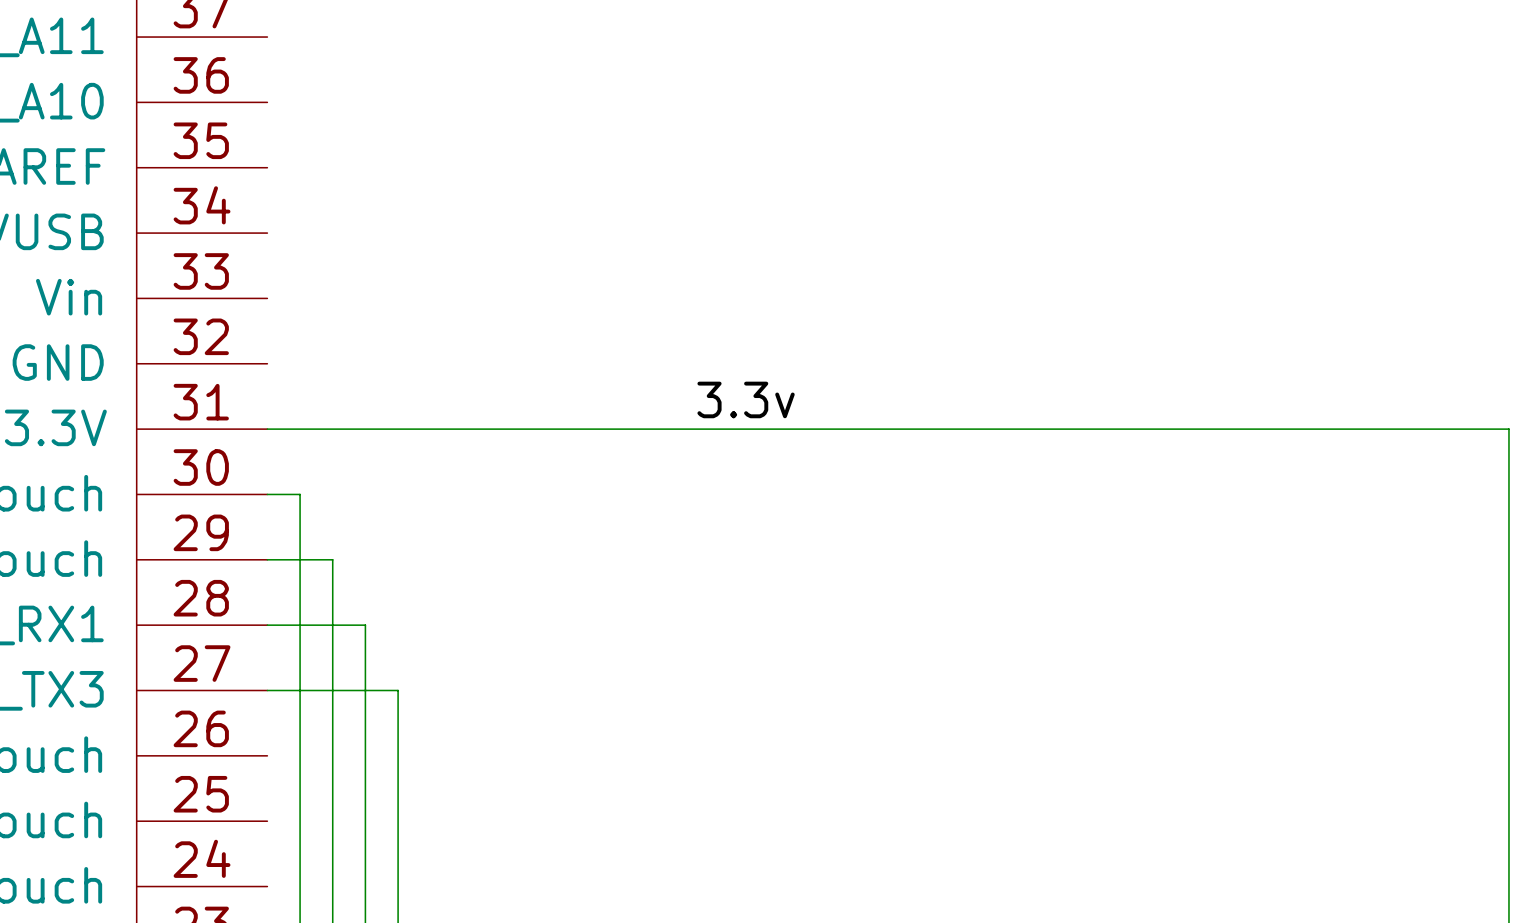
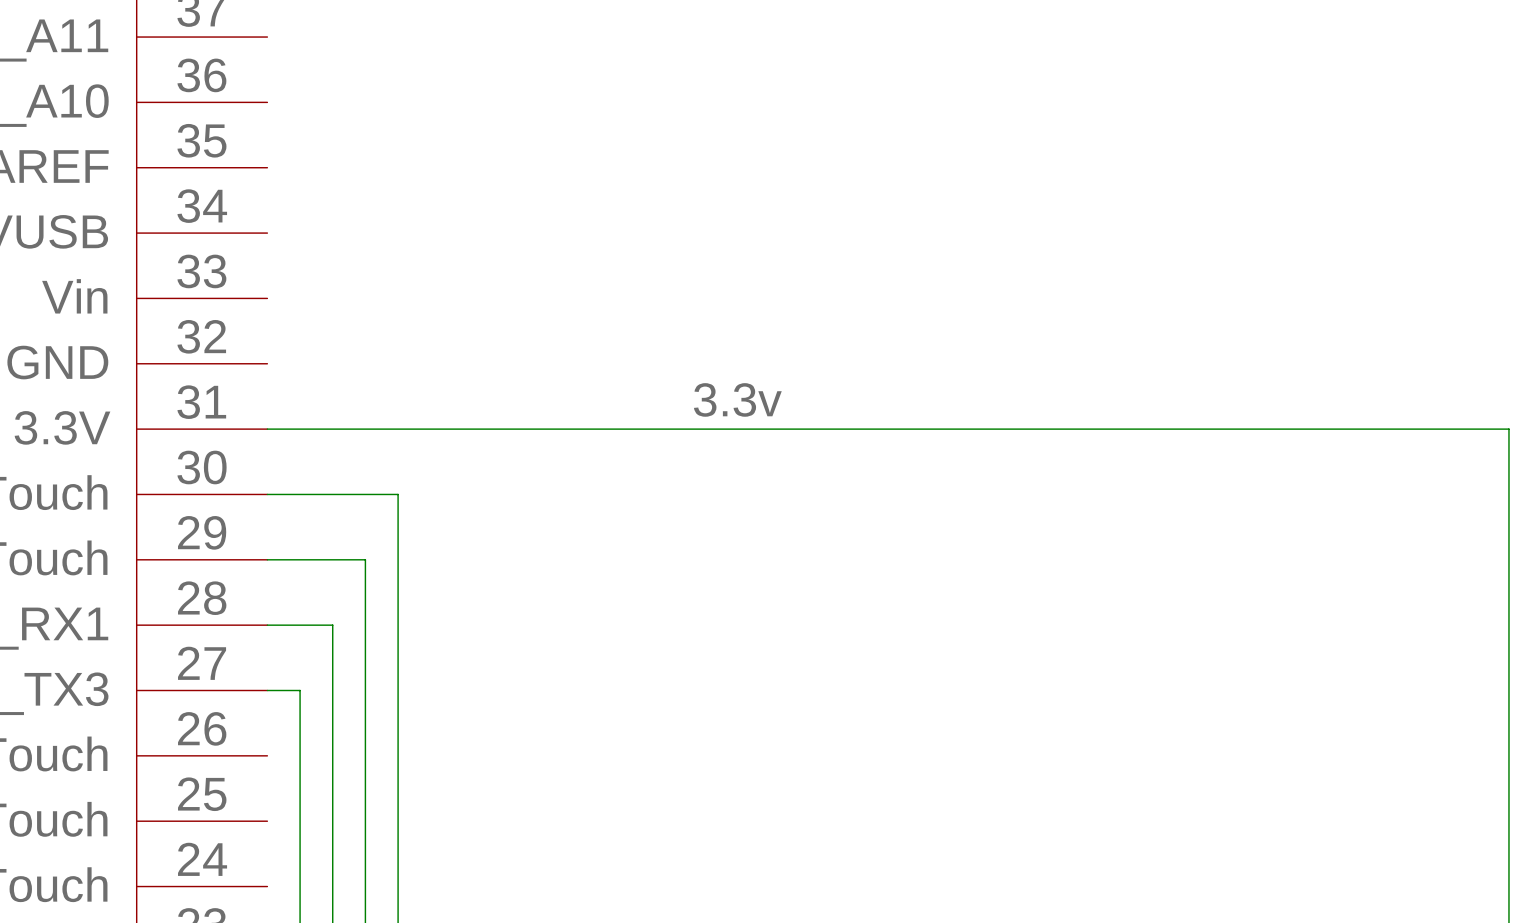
wire: (300, 494) (300, 690) (398, 690) -> (300, 494) (398, 494) (398, 690)
wire: (332, 559) (332, 625) (365, 625) -> (332, 559) (365, 559) (365, 625)

